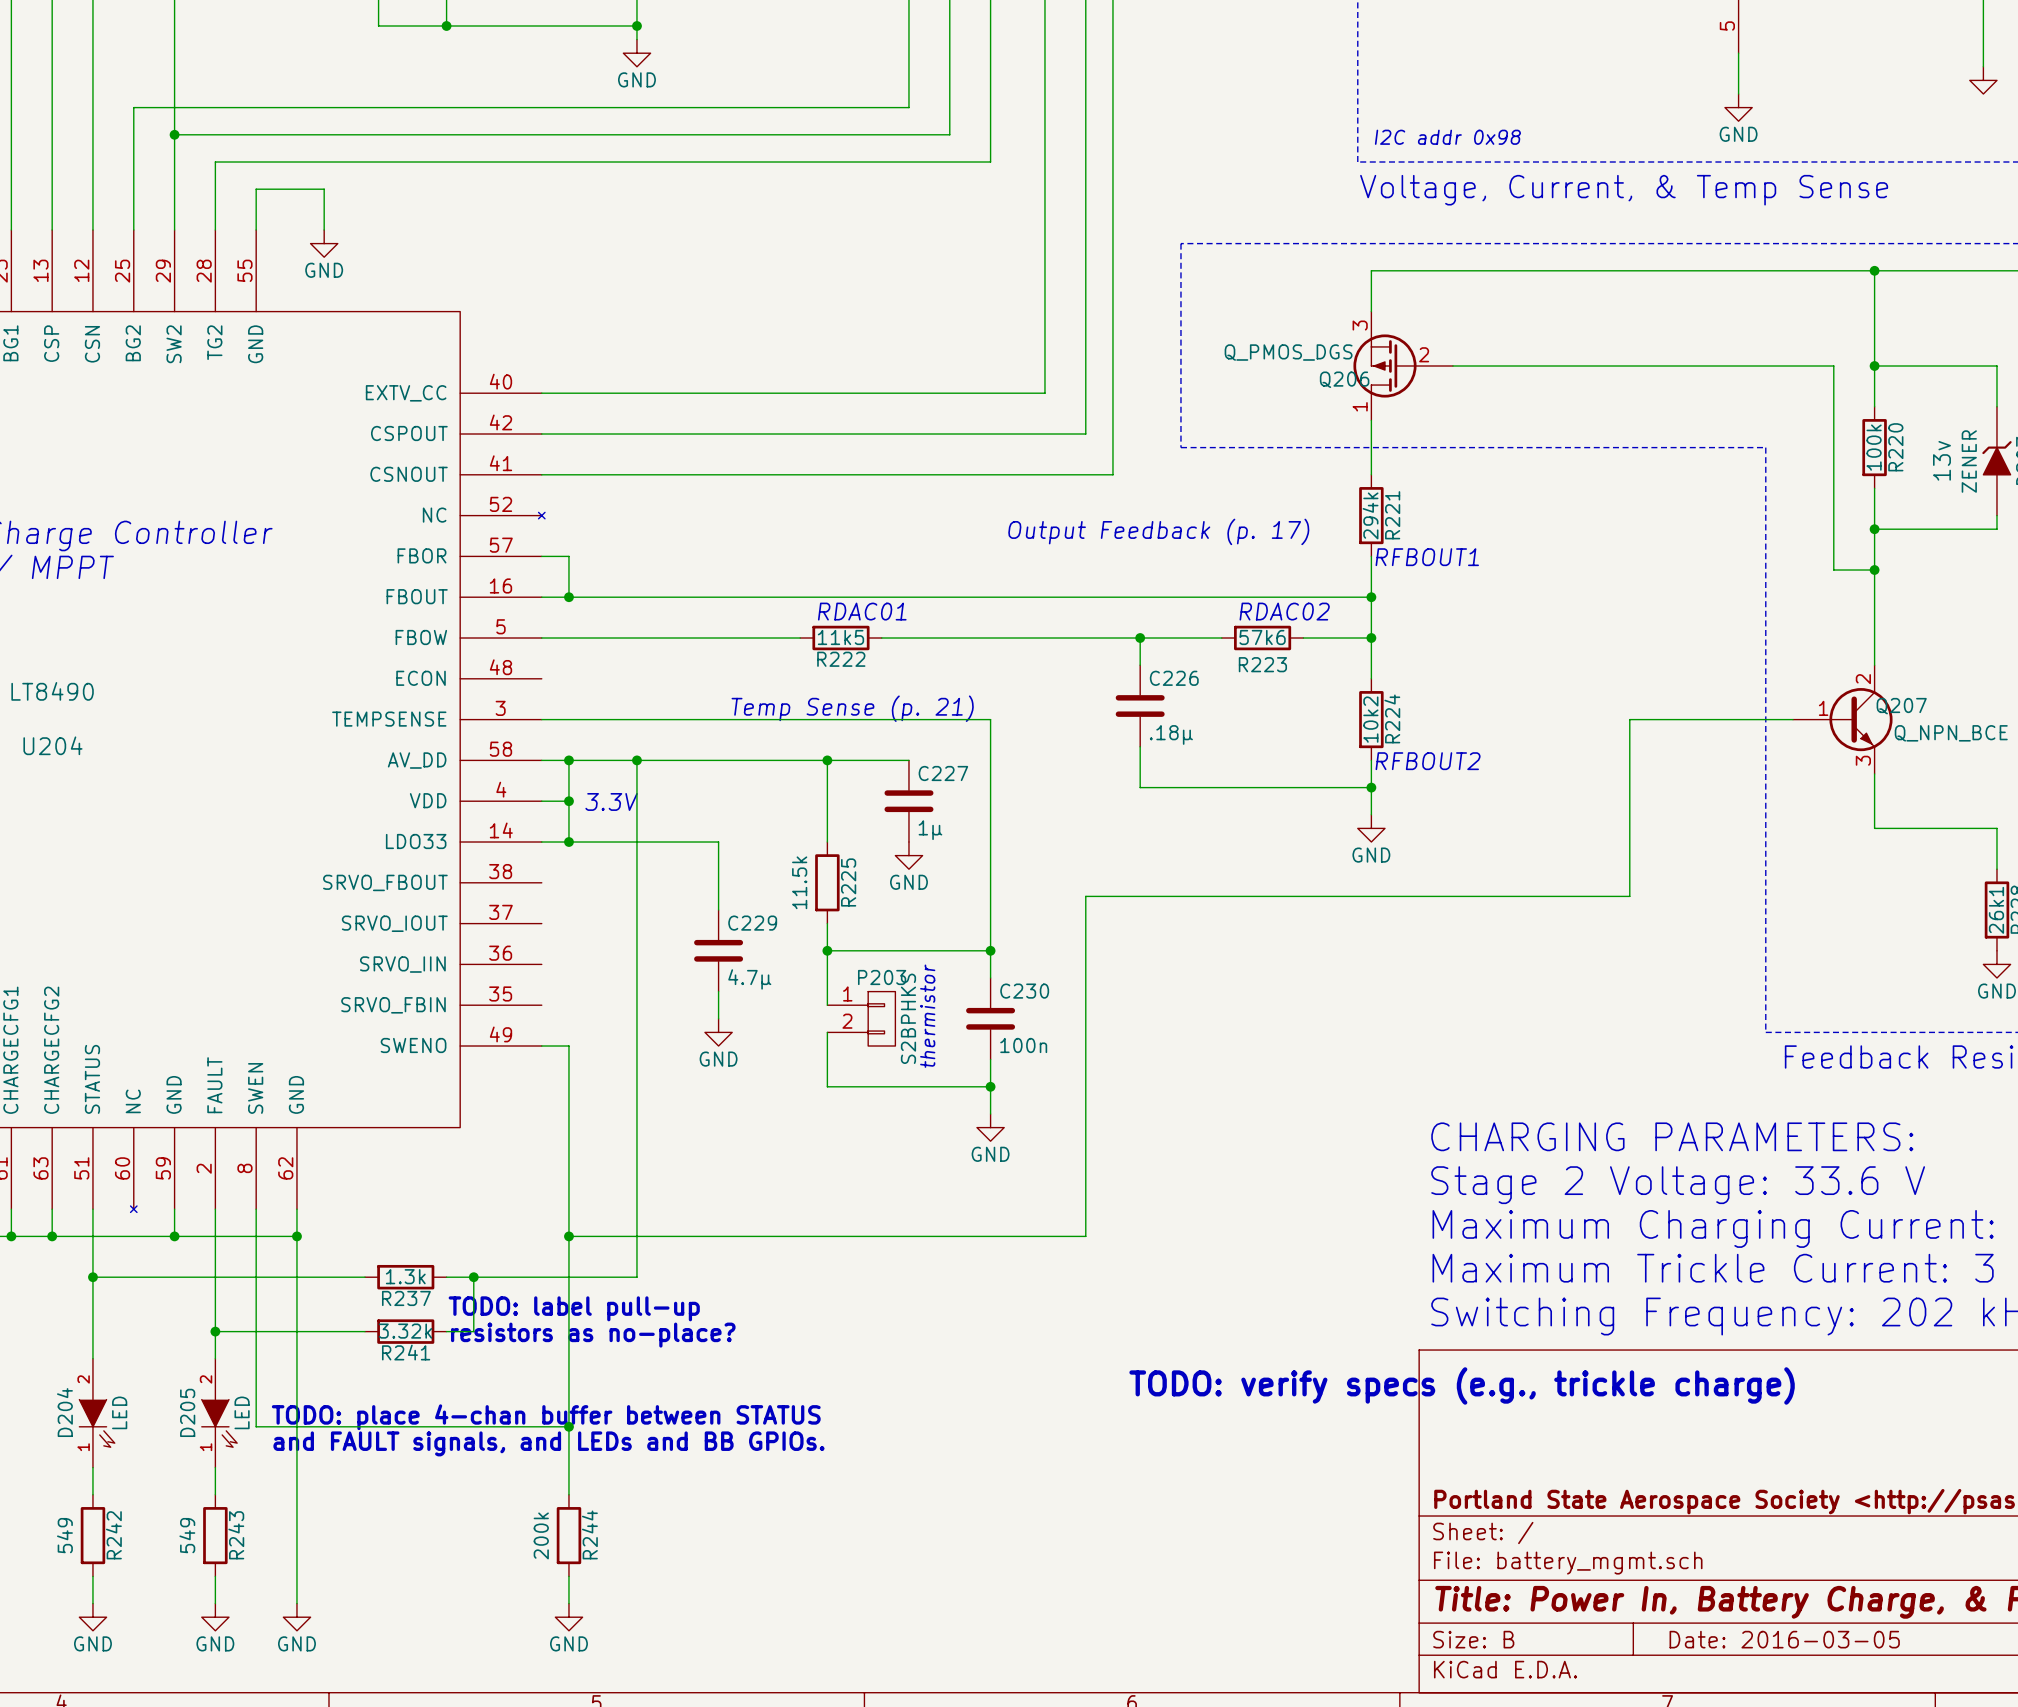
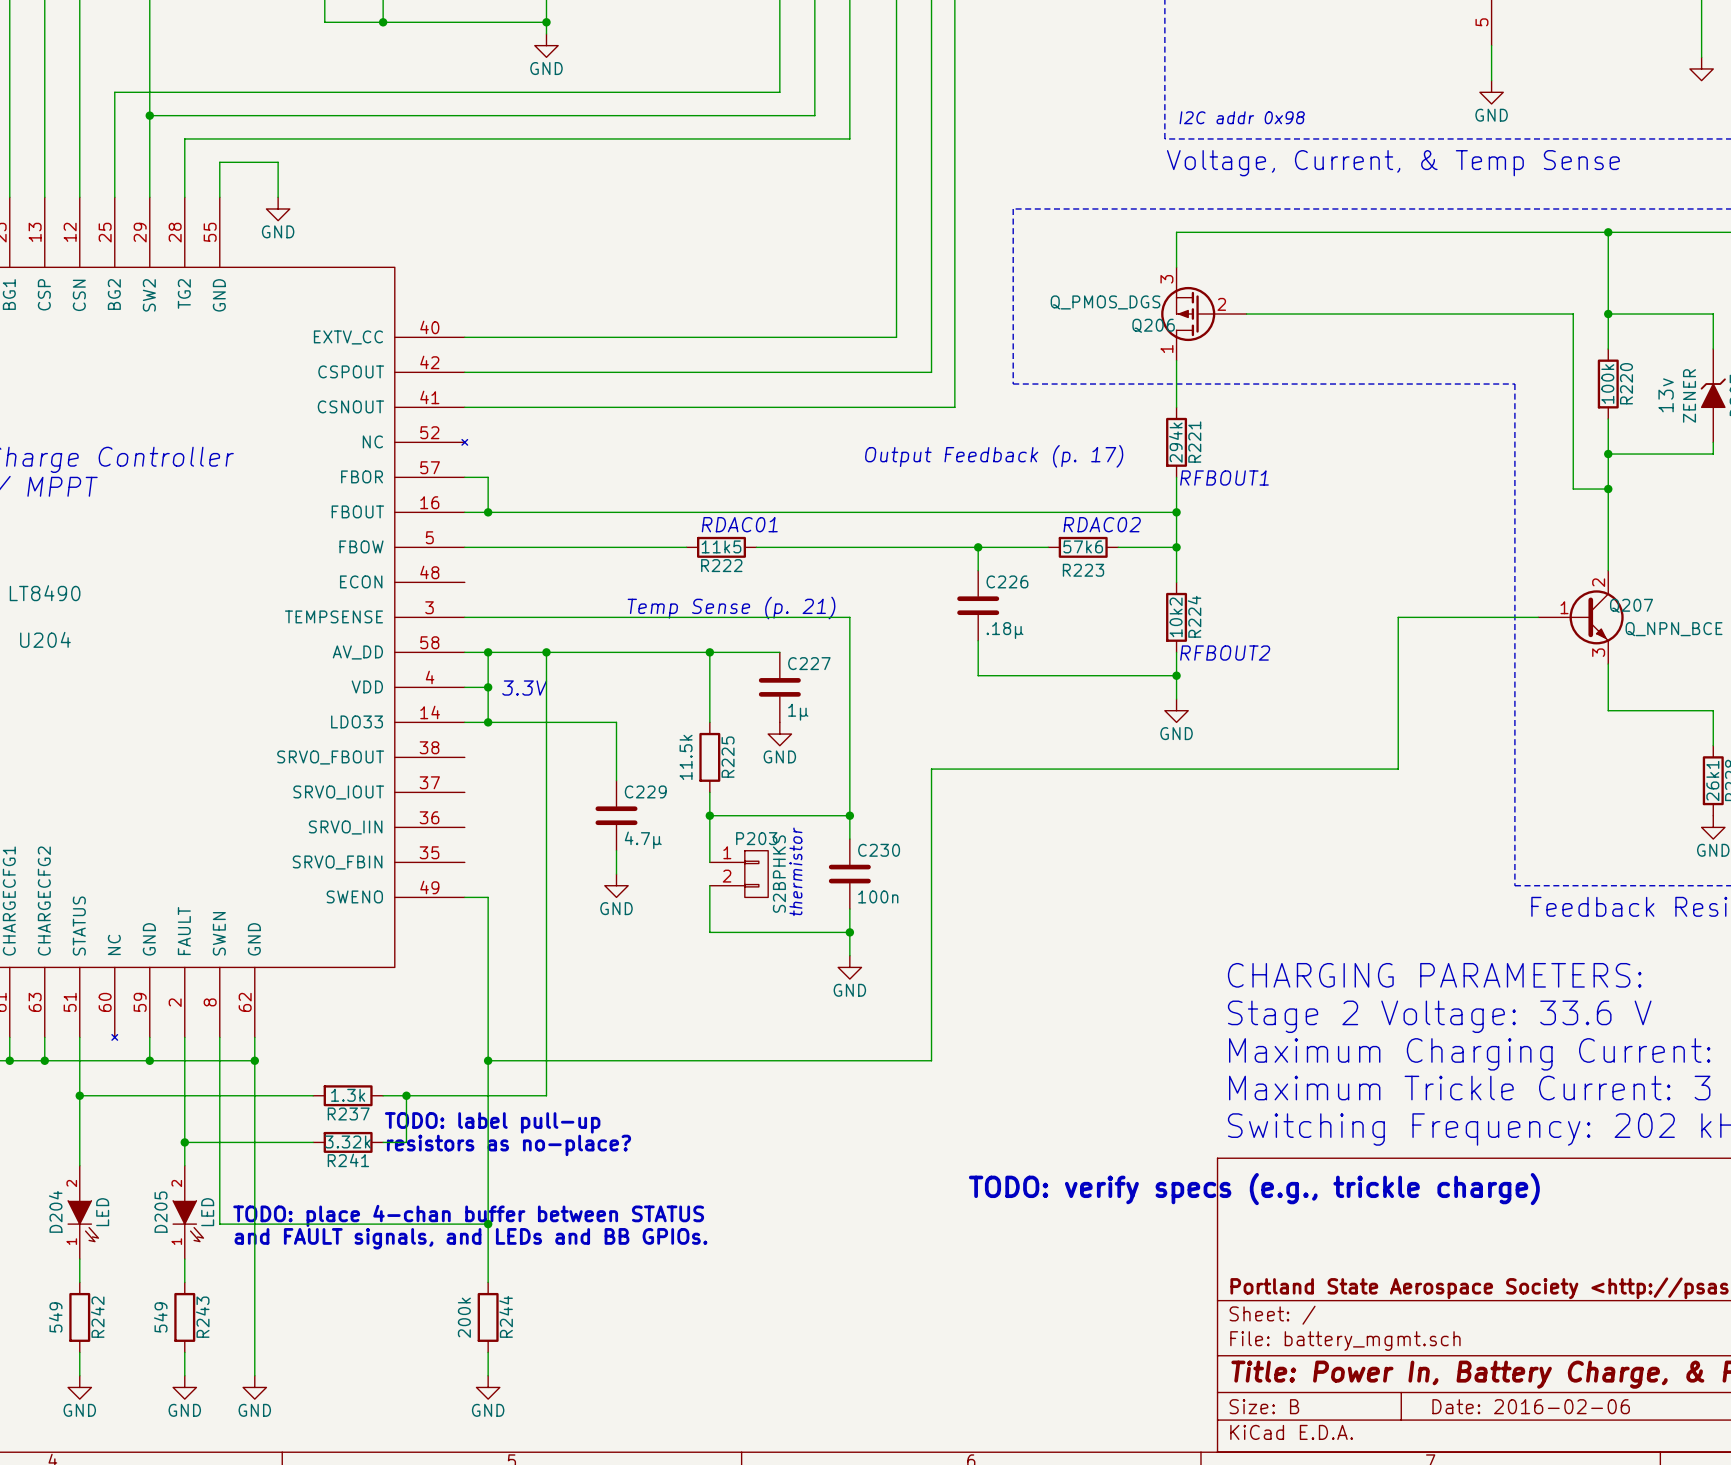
title block: Date: 2016-03-05 (1784, 1639) -> Date: 2016-02-06 (1531, 1406)

